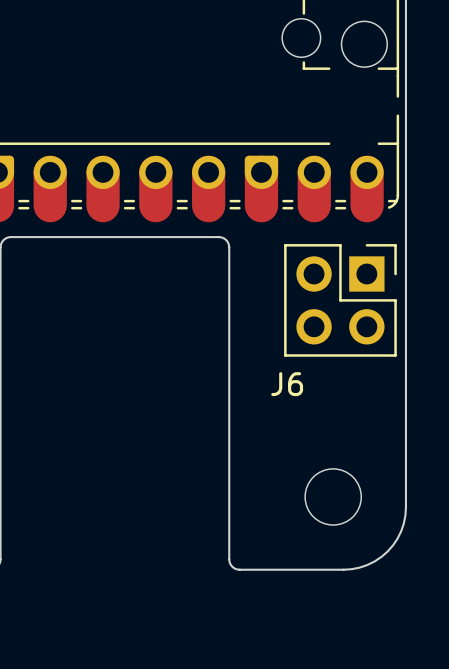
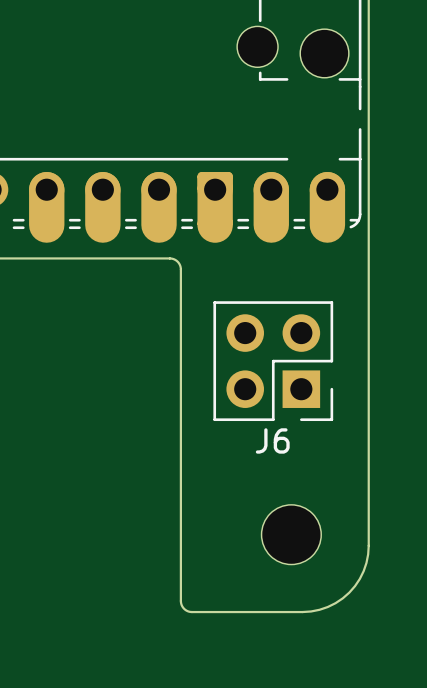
J6 rotation: 0° (340, 300) -> 90° clockwise (273, 361)
J6 name position: J6 (287, 384) -> J6 (272, 440)

